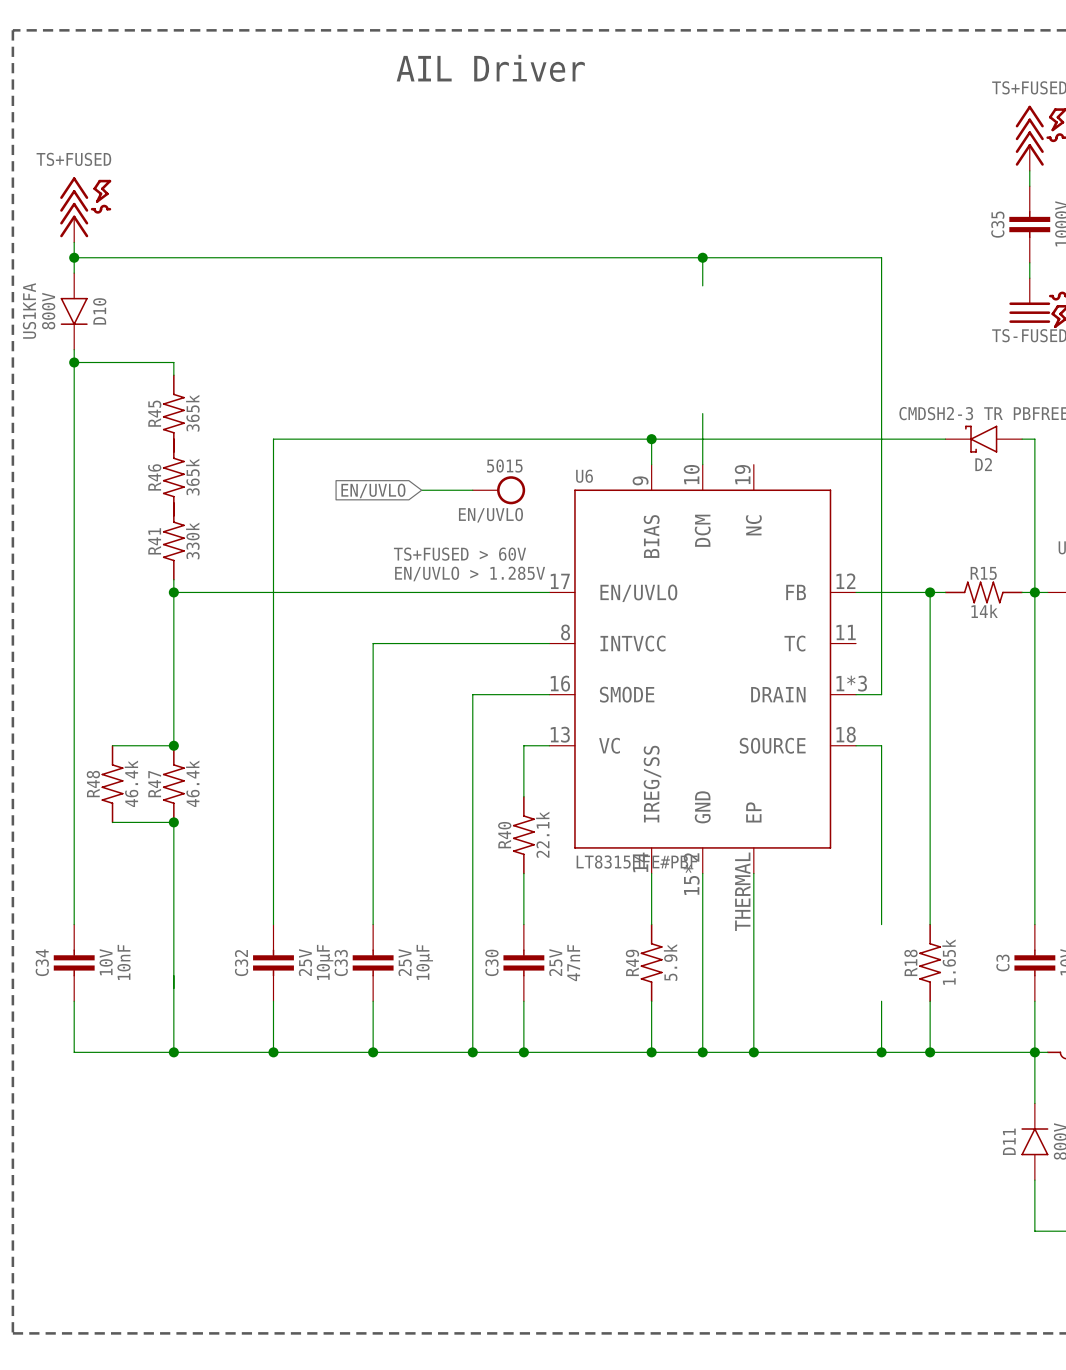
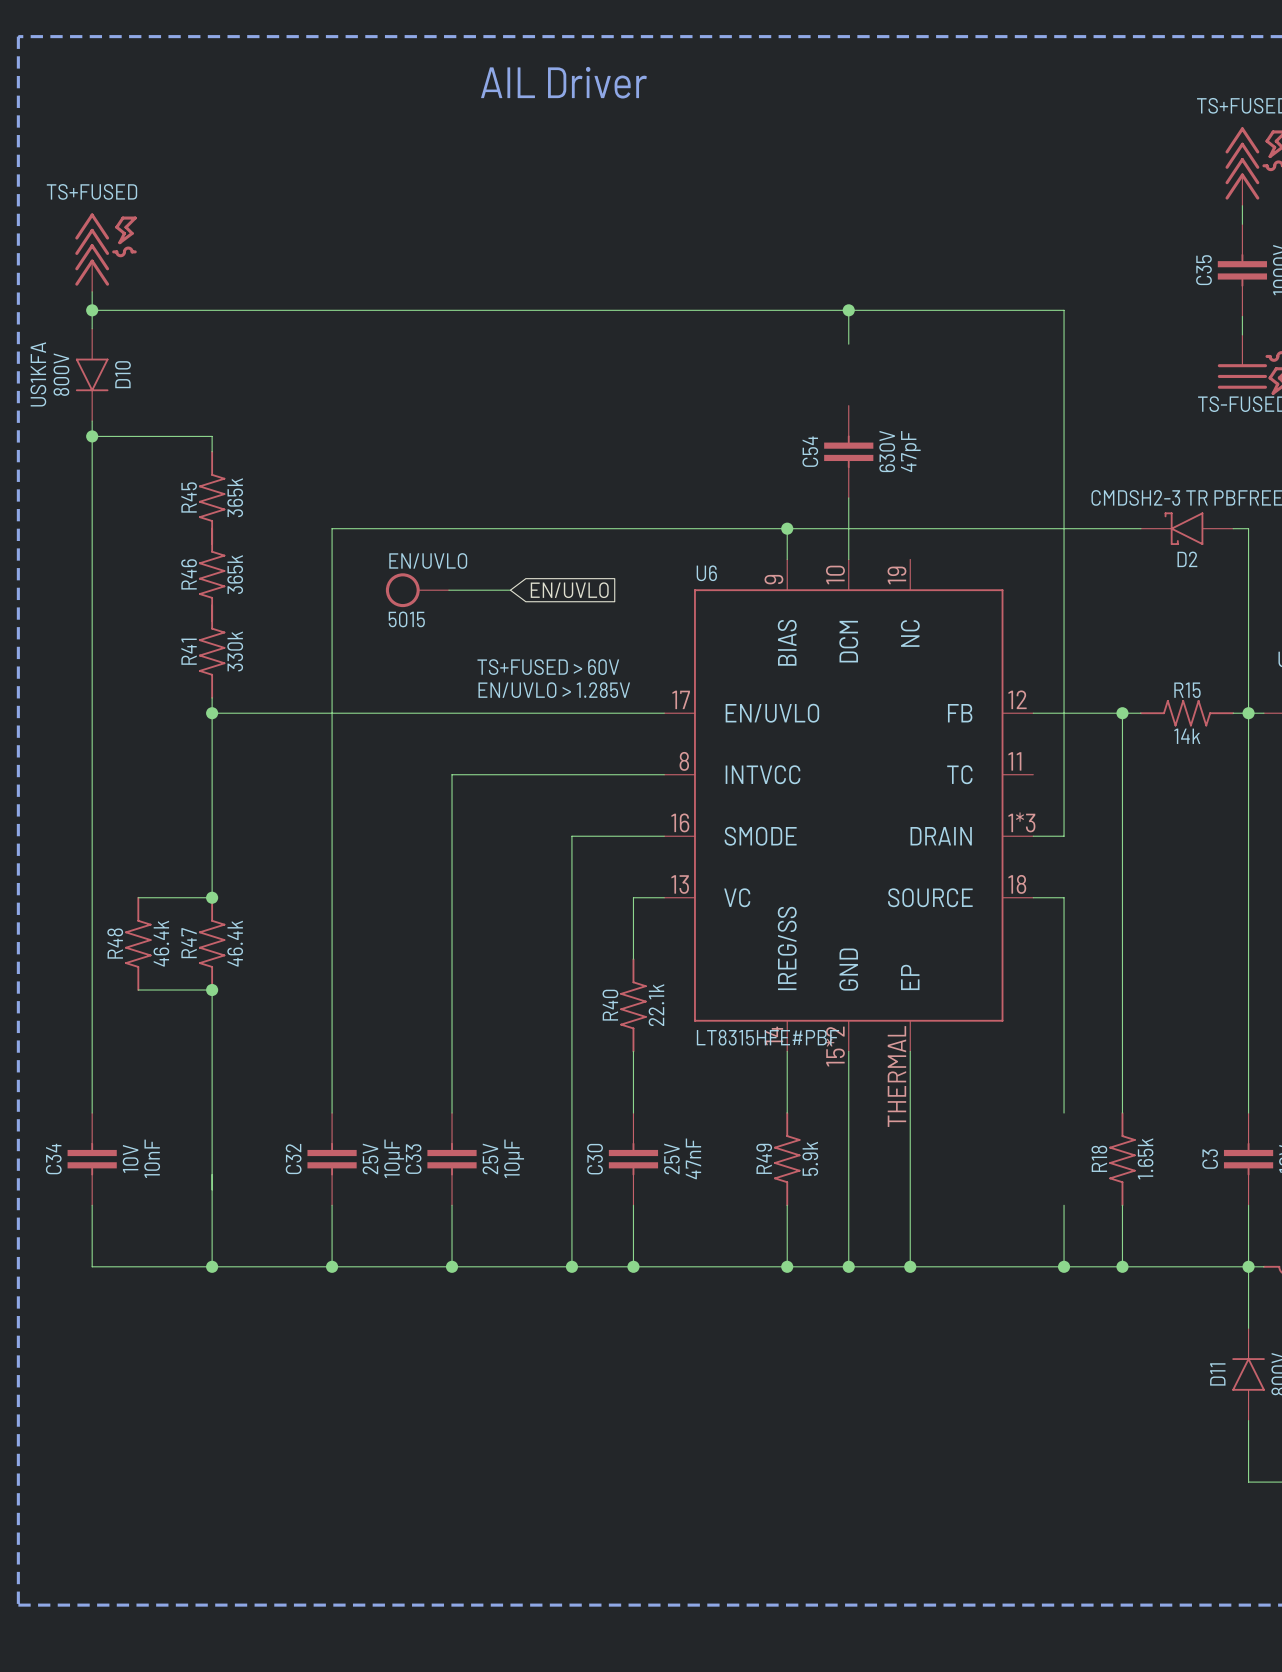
C54: none -> (848, 451)
global label rotation: 0° (373, 490) -> 180° (569, 590)
wire: (421, 490) (472, 490) -> (510, 590) (448, 590)
EN/UVLO position: (498, 490) -> (417, 590)
EN/UVLO rotation: 0° (511, 490) -> 180° (402, 590)

